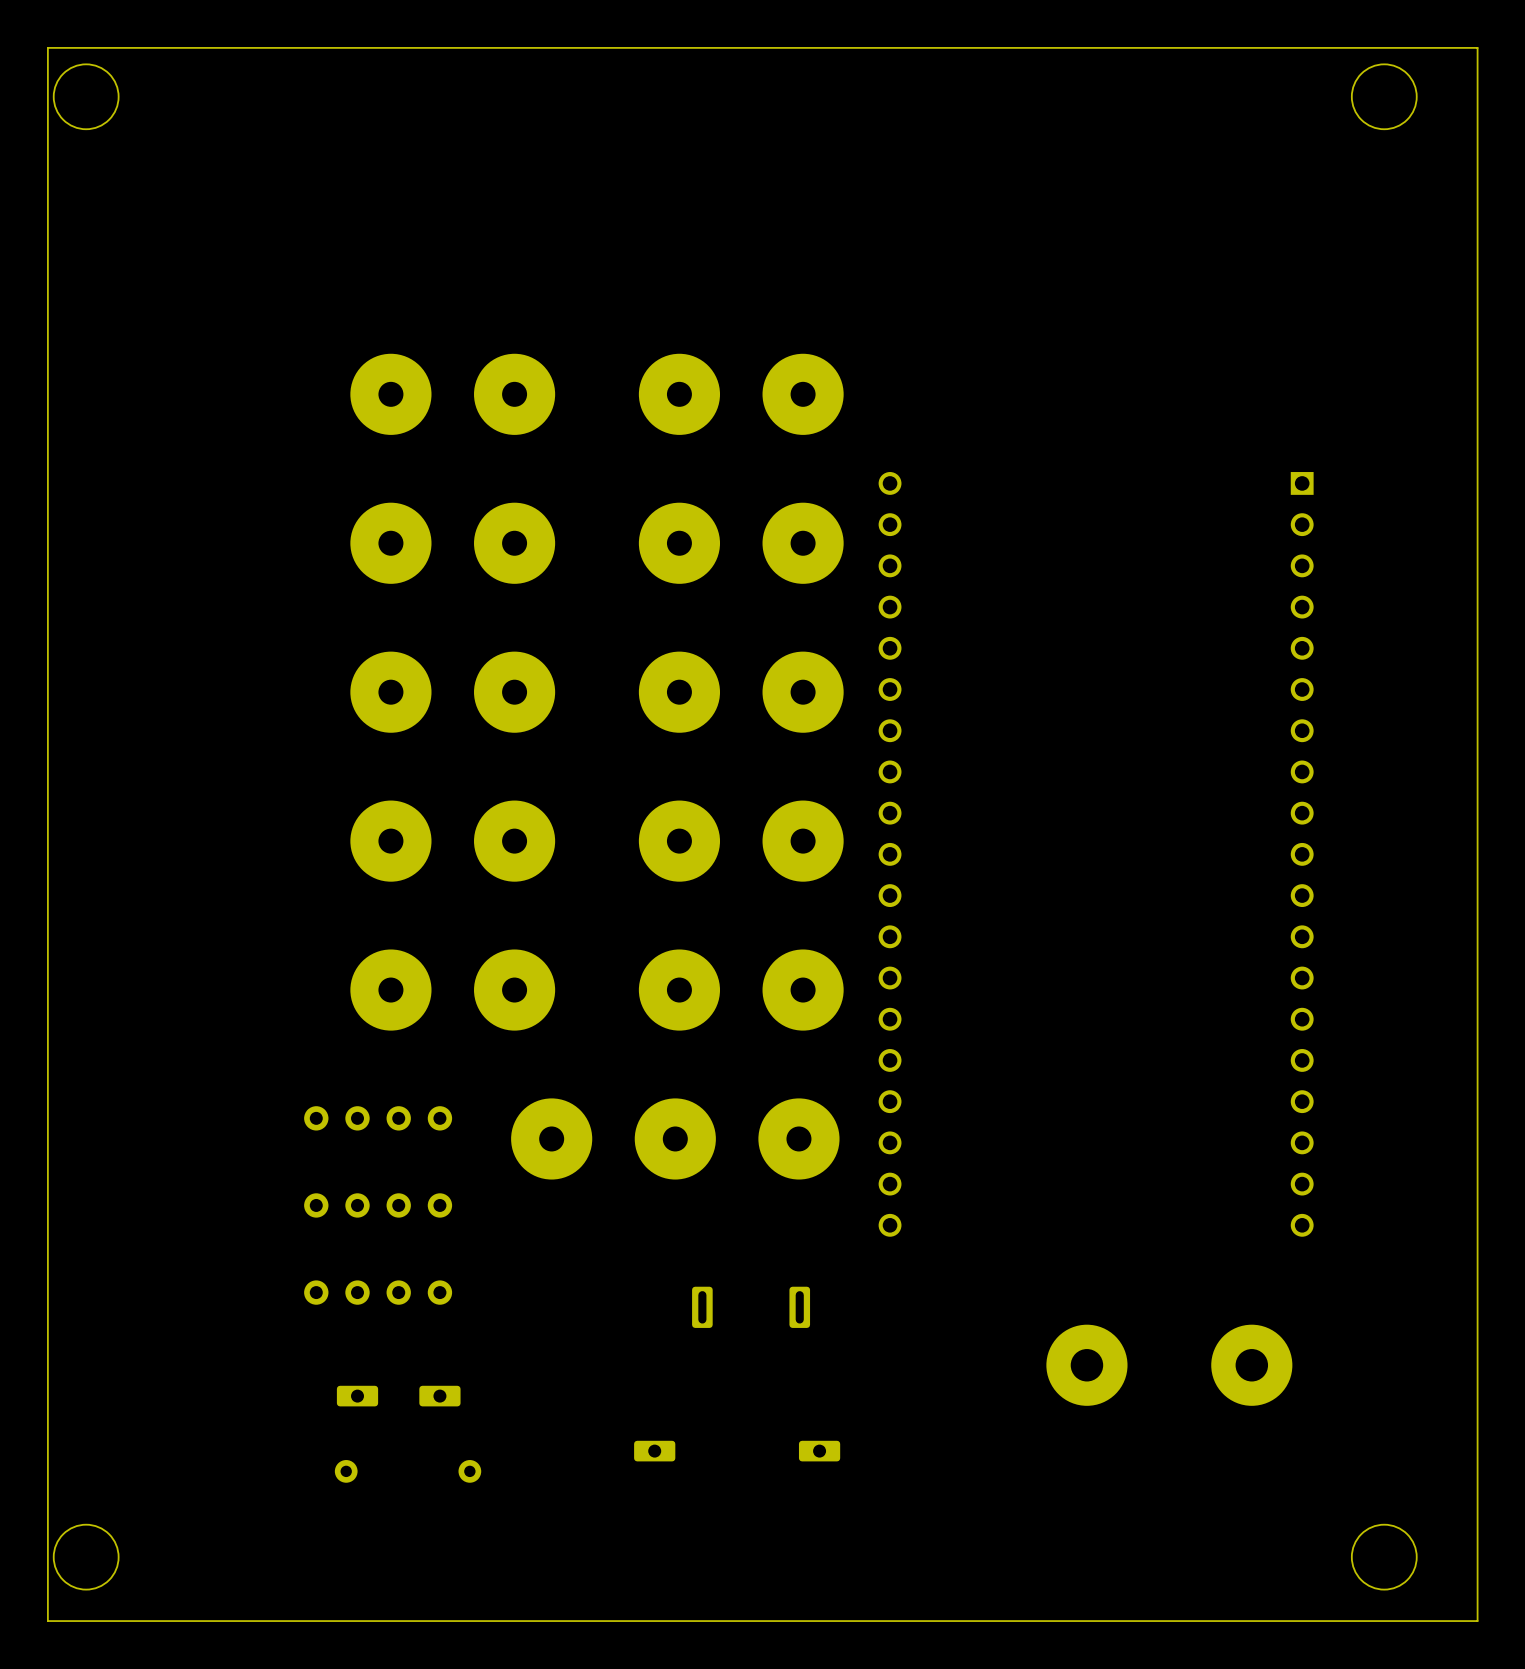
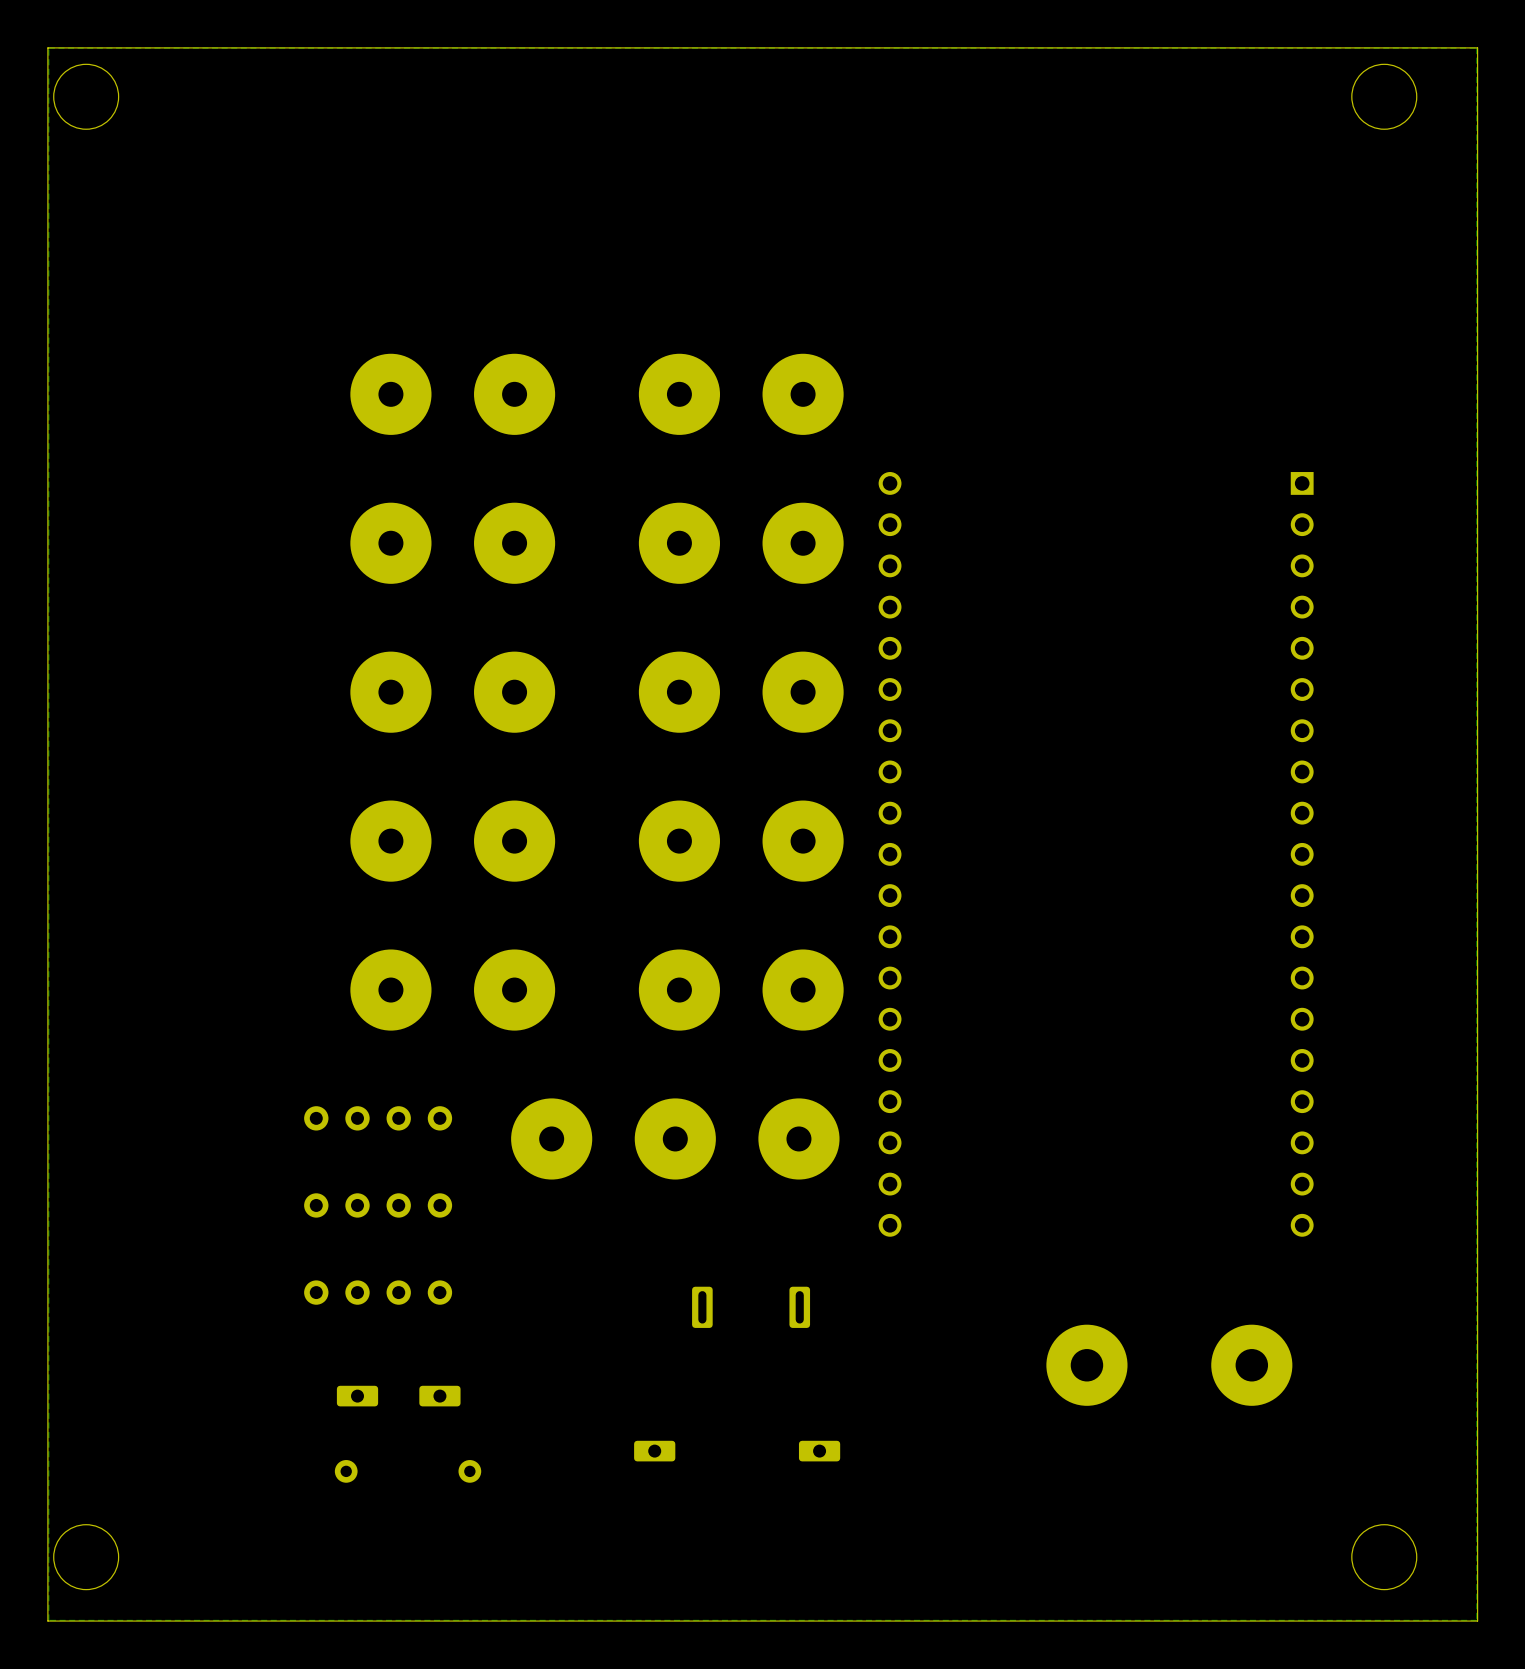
bottom zone outline: none -> (1476, 48) (48, 48) (48, 1620) (1476, 1620) (1476, 48)

